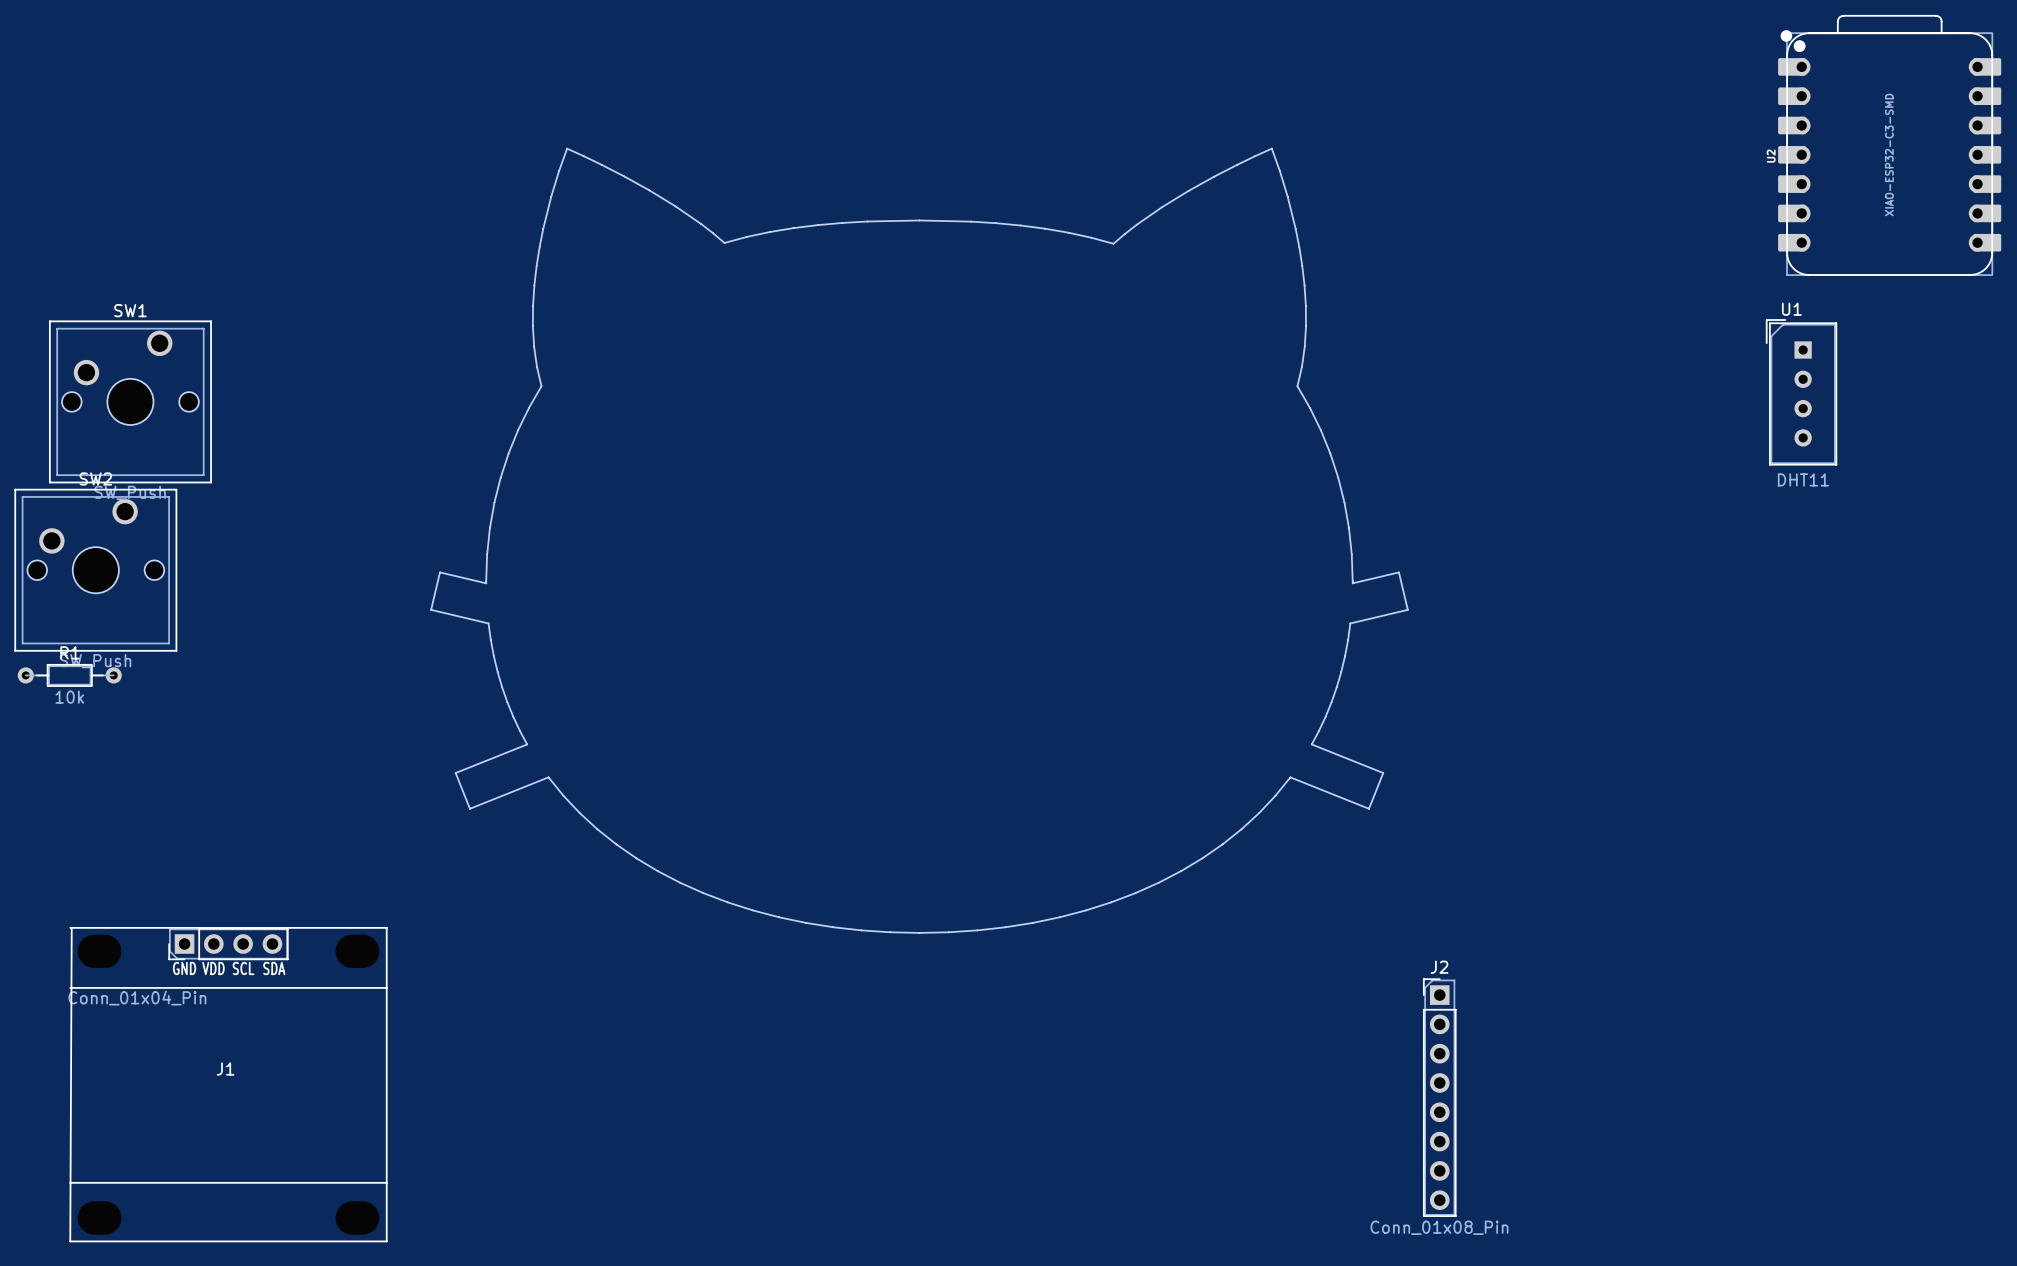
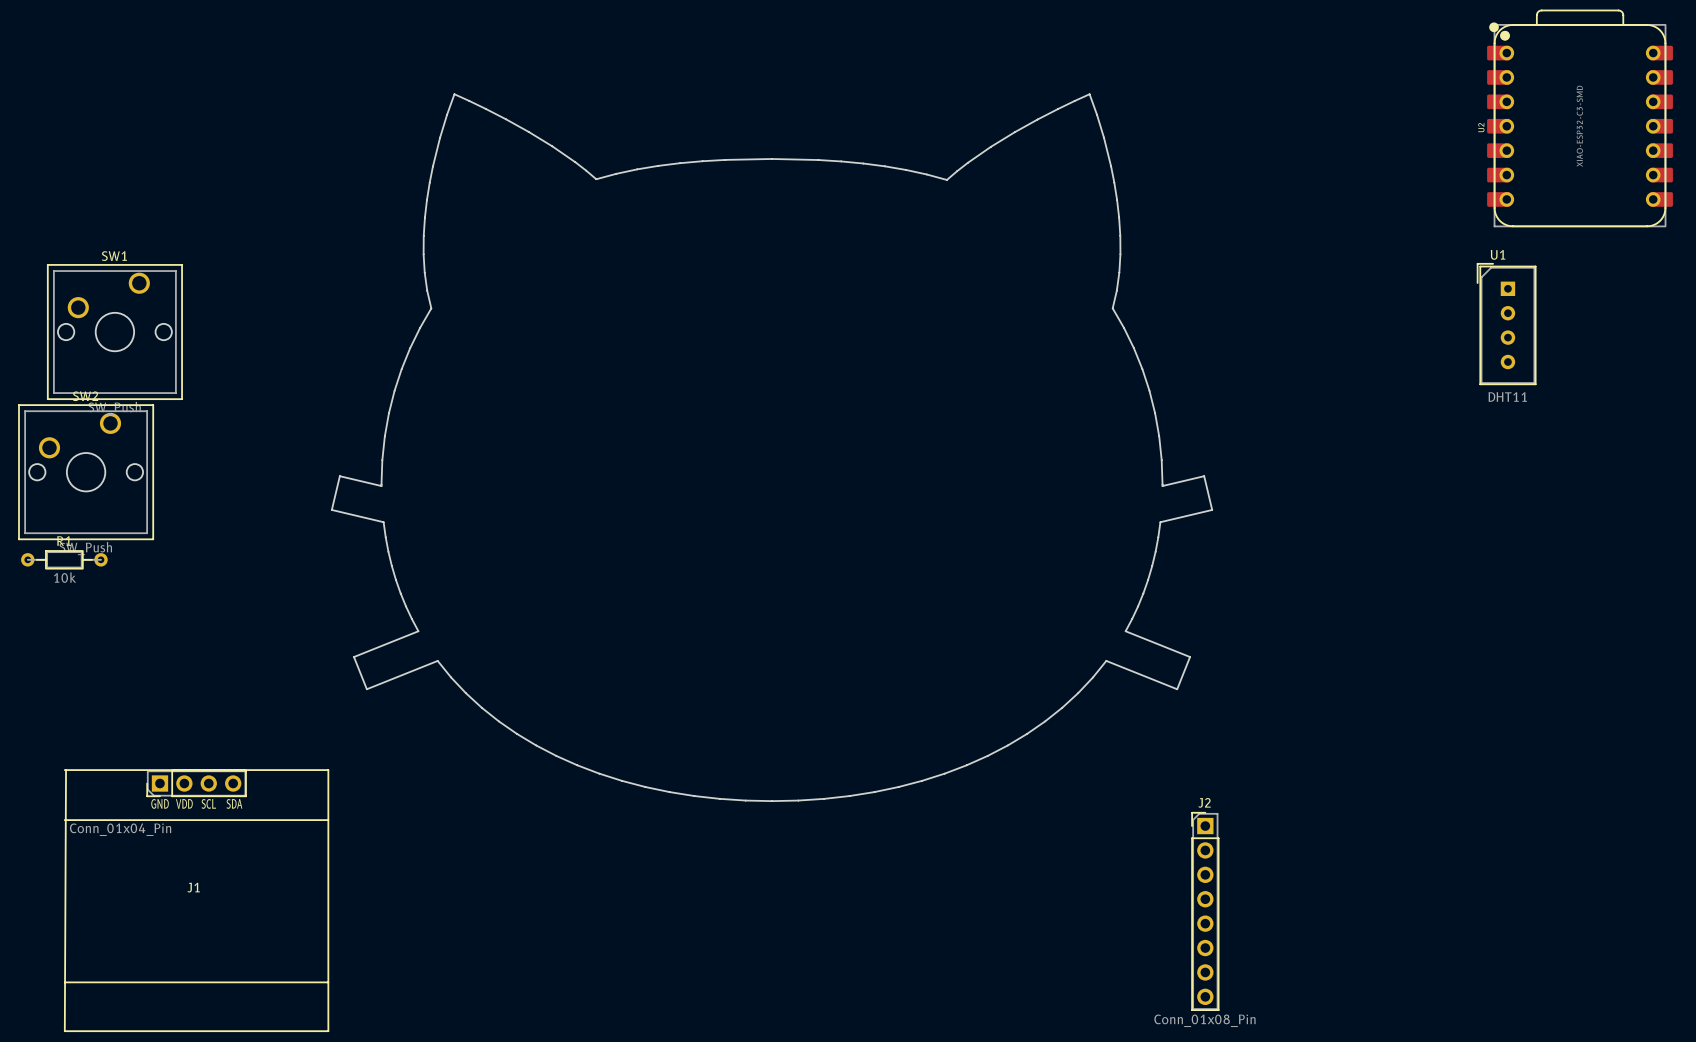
board edge: (567, 148) (551, 196) (543, 228) (534, 285) (534, 346) (541, 386) (518, 430) (500, 477) (489, 528) (486, 583) (440, 572) (431, 609) (488, 623) (493, 656) (502, 687) (513, 716) (527, 744) (455, 773) (469, 808) (548, 777) (579, 813) (616, 844) (657, 871) (703, 893) (752, 910) (805, 922) (861, 930) (919, 932) (977, 930) (1033, 922) (1085, 910) (1135, 893) (1181, 871) (1222, 844) (1259, 813) (1290, 777) (1368, 808) (1383, 773) (1311, 744) (1325, 716) (1336, 687) (1345, 656) (1350, 623) (1407, 609) (1398, 572) (1352, 583) (1349, 528) (1338, 477) (1320, 430) (1297, 386) (1304, 346) (1304, 285) (1295, 228) (1287, 196) (1271, 148) (1188, 190) (1136, 224) (1113, 243) (1068, 232) (1020, 225) (919, 220) (817, 225) (769, 232) (724, 242) (701, 224) (649, 190) (567, 148) -> (454, 94) (432, 166) (424, 217) (424, 272) (431, 308) (410, 348) (394, 390) (384, 436) (381, 486) (339, 476) (331, 509) (383, 522) (395, 579) (418, 631) (354, 657) (366, 689) (437, 660) (465, 693) (498, 721) (536, 745) (577, 765) (621, 780) (669, 792) (719, 798) (772, 801) (824, 798) (874, 792) (922, 780) (966, 765) (1007, 745) (1045, 721) (1078, 693) (1106, 660) (1177, 689) (1190, 657) (1125, 631) (1148, 579) (1160, 522) (1212, 509) (1204, 476) (1162, 486) (1159, 436) (1149, 390) (1133, 348) (1112, 308) (1119, 272) (1119, 217) (1111, 166) (1089, 94) (1014, 132) (967, 162) (946, 179) (906, 169) (863, 163) (772, 158) (680, 163) (637, 169) (596, 179) (575, 162) (528, 131) (454, 94)

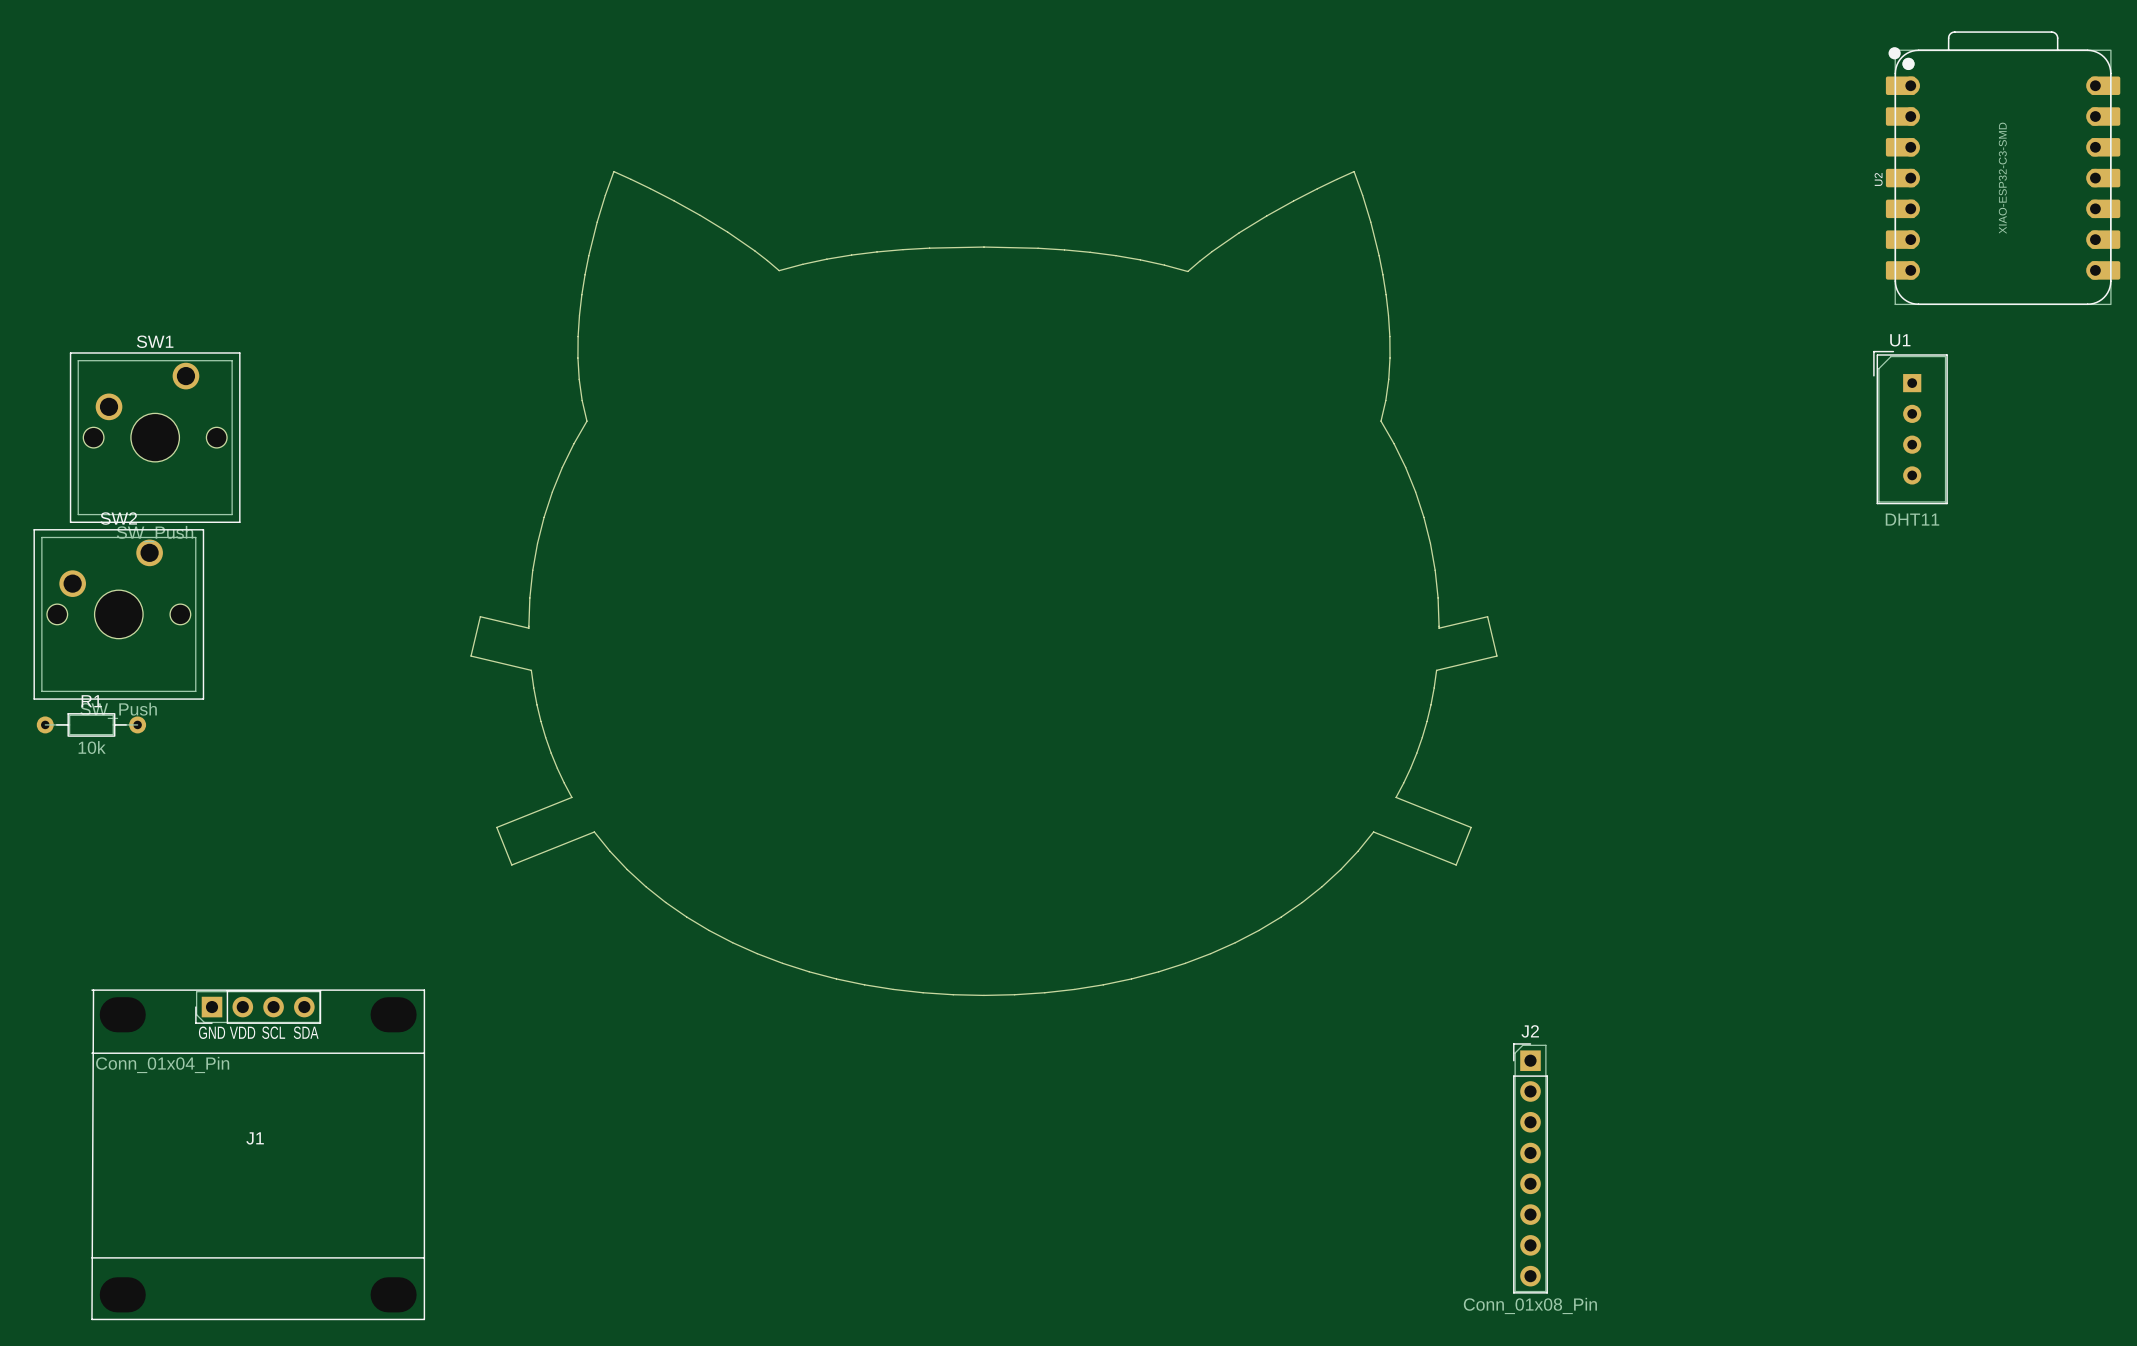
board edge: (454, 94) (432, 166) (424, 217) (424, 272) (431, 308) (410, 348) (394, 390) (384, 436) (381, 486) (339, 476) (331, 509) (383, 522) (395, 579) (418, 631) (354, 657) (366, 689) (437, 660) (465, 693) (498, 721) (536, 745) (577, 765) (621, 780) (669, 792) (719, 798) (772, 801) (824, 798) (874, 792) (922, 780) (966, 765) (1007, 745) (1045, 721) (1078, 693) (1106, 660) (1177, 689) (1190, 657) (1125, 631) (1148, 579) (1160, 522) (1212, 509) (1204, 476) (1162, 486) (1159, 436) (1149, 390) (1133, 348) (1112, 308) (1119, 272) (1119, 217) (1111, 166) (1089, 94) (1014, 132) (967, 162) (946, 179) (906, 169) (863, 163) (772, 158) (680, 163) (637, 169) (596, 179) (575, 162) (528, 131) (454, 94) -> (613, 171) (597, 222) (588, 255) (579, 315) (579, 379) (586, 421) (562, 467) (544, 517) (532, 570) (528, 628) (480, 616) (471, 656) (531, 670) (536, 704) (545, 737) (557, 768) (571, 797) (496, 827) (511, 865) (594, 832) (627, 869) (665, 902) (709, 930) (757, 953) (809, 971) (864, 984) (923, 992) (983, 995) (1044, 992) (1103, 984) (1158, 971) (1210, 953) (1258, 930) (1302, 902) (1340, 869) (1373, 832) (1456, 865) (1471, 827) (1396, 797) (1410, 768) (1422, 737) (1431, 704) (1436, 670) (1496, 656) (1487, 616) (1439, 628) (1435, 570) (1423, 517) (1405, 467) (1381, 421) (1388, 379) (1388, 315) (1379, 255) (1370, 222) (1354, 171) (1266, 215) (1212, 251) (1187, 271) (1140, 259) (1090, 252) (983, 247) (877, 251) (826, 259) (779, 270) (754, 250) (700, 215) (613, 171)

